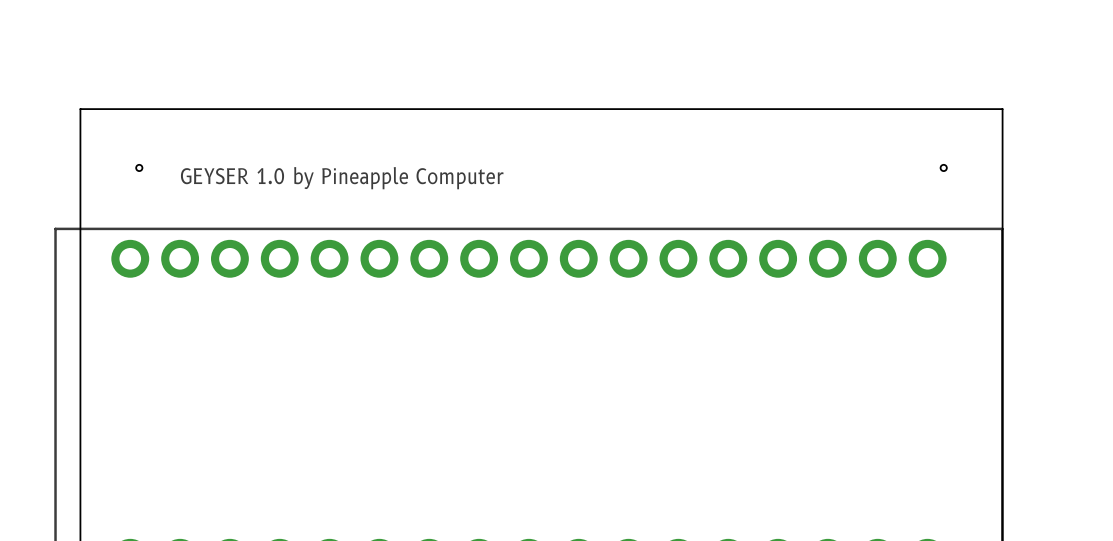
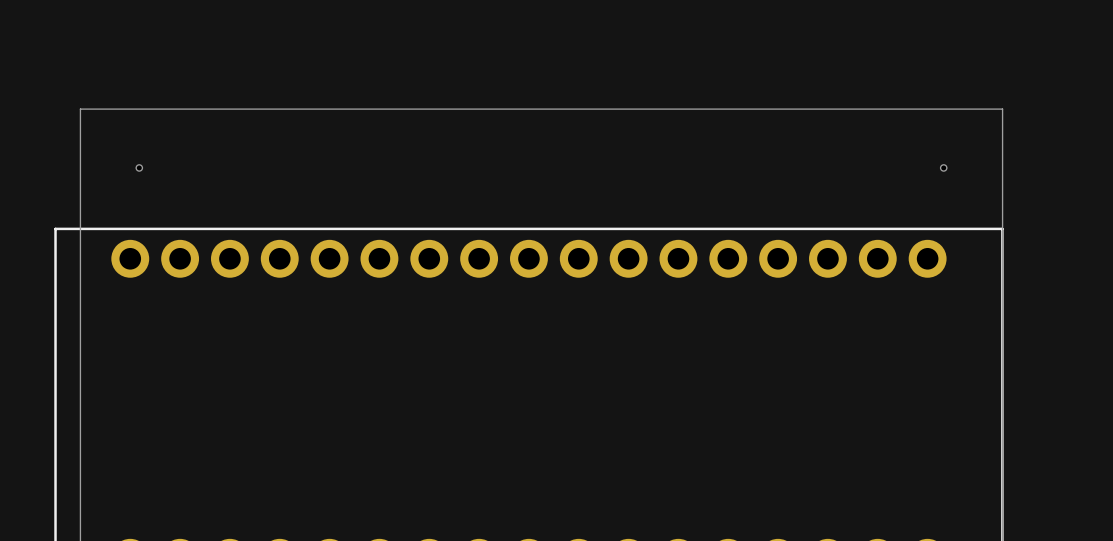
text: GEYSER 1.0 by Pineapple Computer (342, 178) -> none

